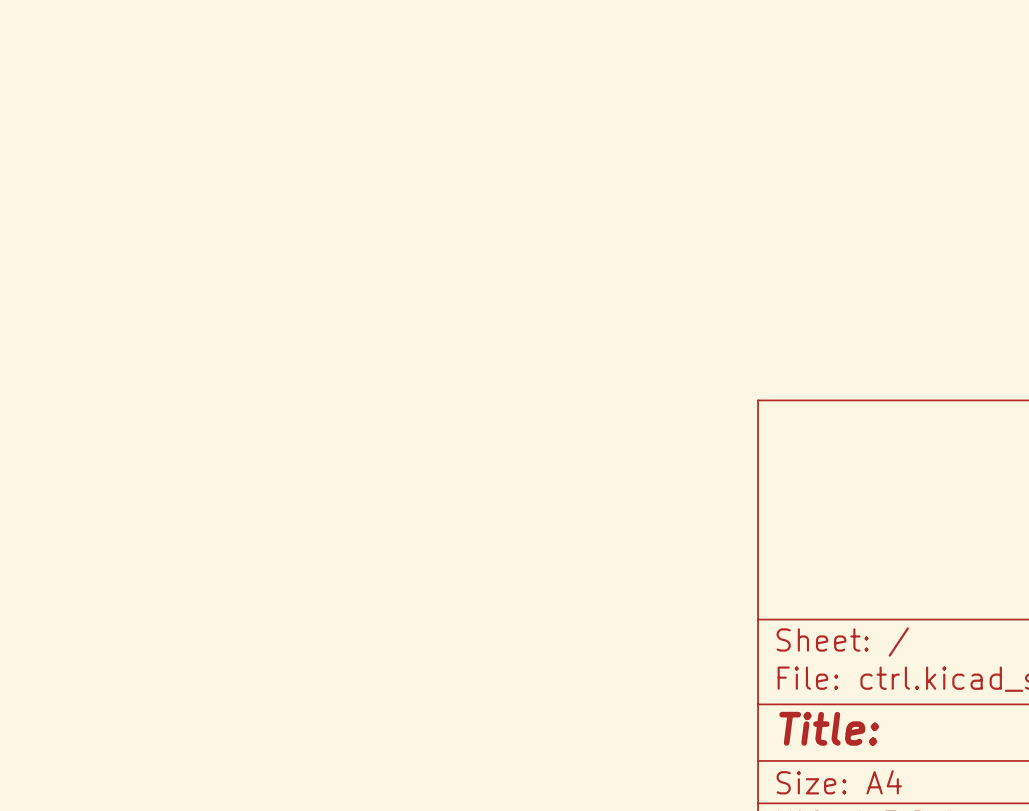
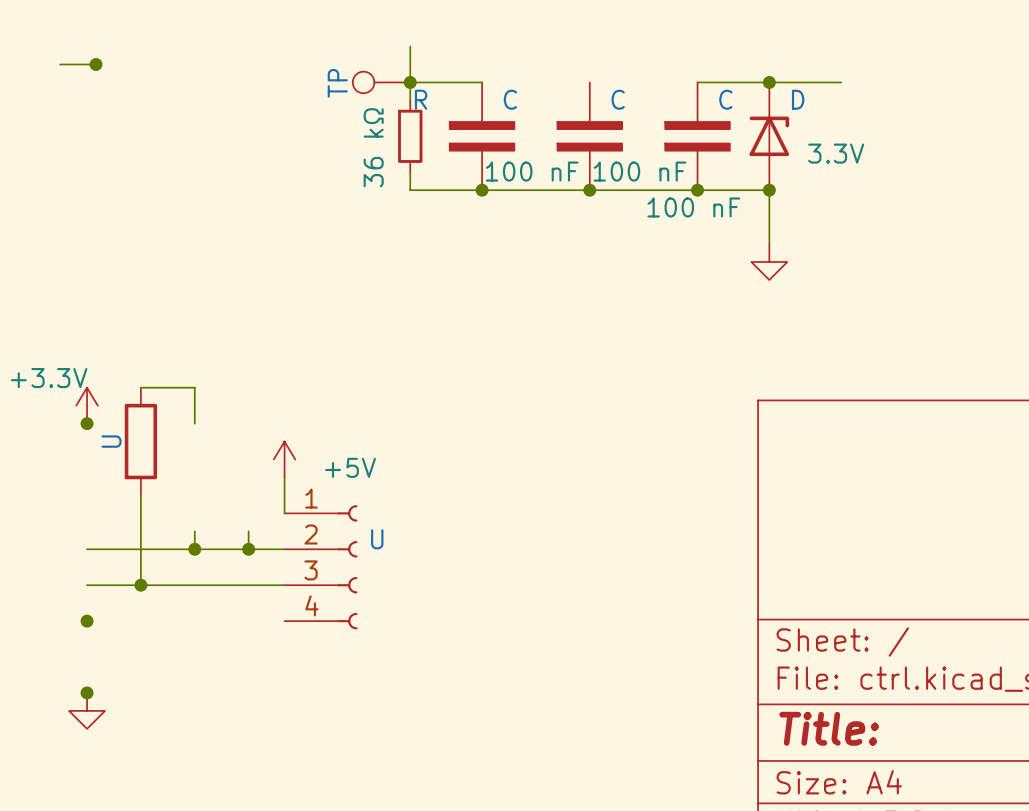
wire: none -> (410, 46) (410, 100)
wire: none -> (60, 64) (96, 64)
junction: none -> (96, 64)
TP: none -> (381, 82)
wire: none -> (410, 82) (482, 82)
junction: none -> (410, 82)
wire: none -> (697, 82) (841, 82)
junction: none -> (769, 82)
R: none -> (410, 136)
C: none -> (482, 136)
C: none -> (589, 136)
C: none -> (697, 136)
D: none -> (769, 136)
wire: none -> (410, 172) (410, 190) (769, 190) (769, 244)
junction: none -> (482, 190)
junction: none -> (589, 190)
junction: none -> (697, 190)
junction: none -> (769, 190)
power symbol: none -> (769, 262)
wire: none -> (140, 387) (194, 387) (194, 423)
power symbol: none -> +3.3V (87, 405)
junction: none -> (87, 423)
U: none -> (140, 441)
power symbol: none -> +5V (284, 459)
wire: none -> (284, 477) (284, 513)
wire: none -> (140, 495) (140, 585)
wire: none -> (194, 531) (194, 549)
wire: none -> (248, 531) (248, 549)
wire: none -> (87, 549) (284, 549)
junction: none -> (194, 549)
junction: none -> (248, 549)
U: none -> (321, 567)
wire: none -> (87, 585) (284, 585)
junction: none -> (140, 585)
junction: none -> (87, 621)
junction: none -> (87, 692)
power symbol: none -> (87, 710)

